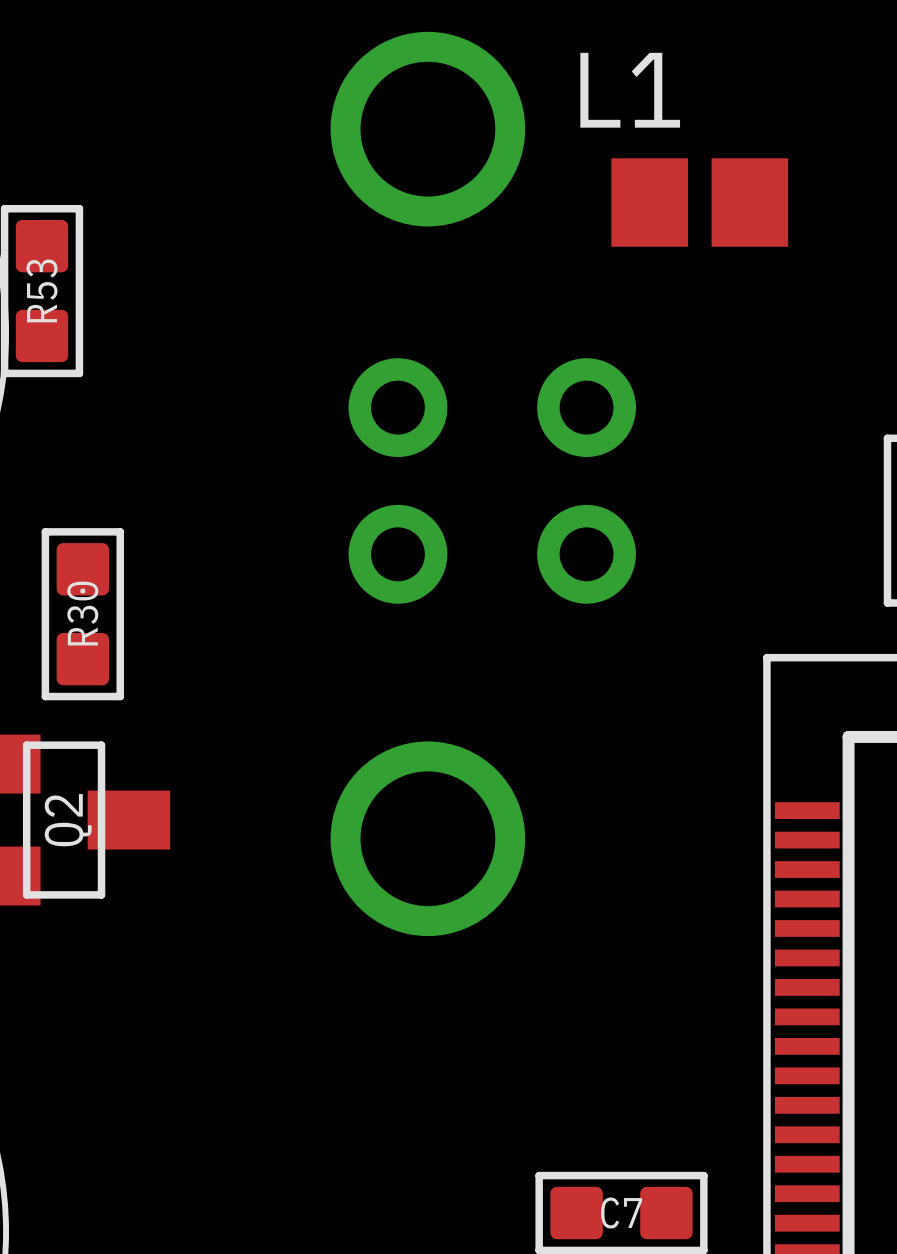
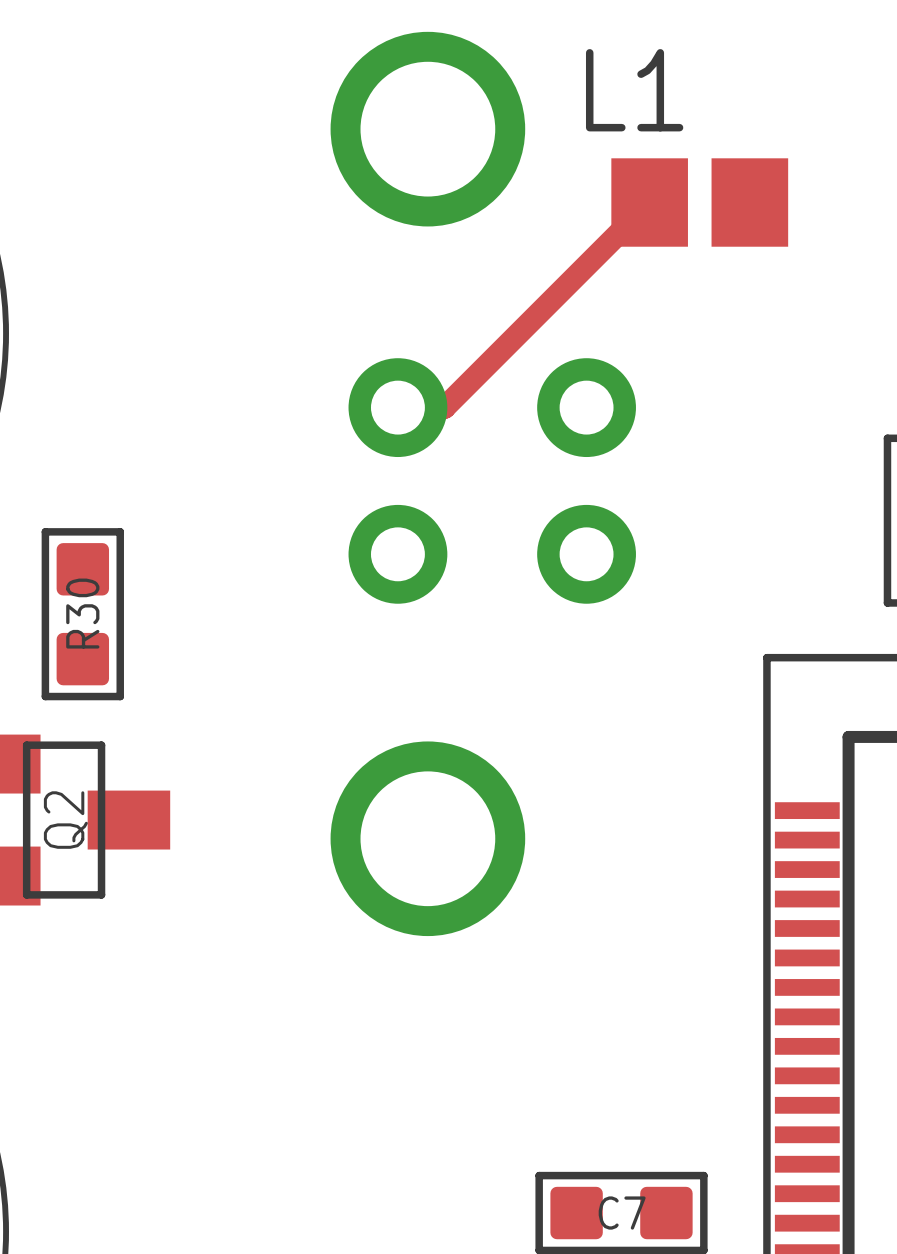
track: none -> (649, 202) (444, 407) (397, 407)
R53: (42, 291) -> none

